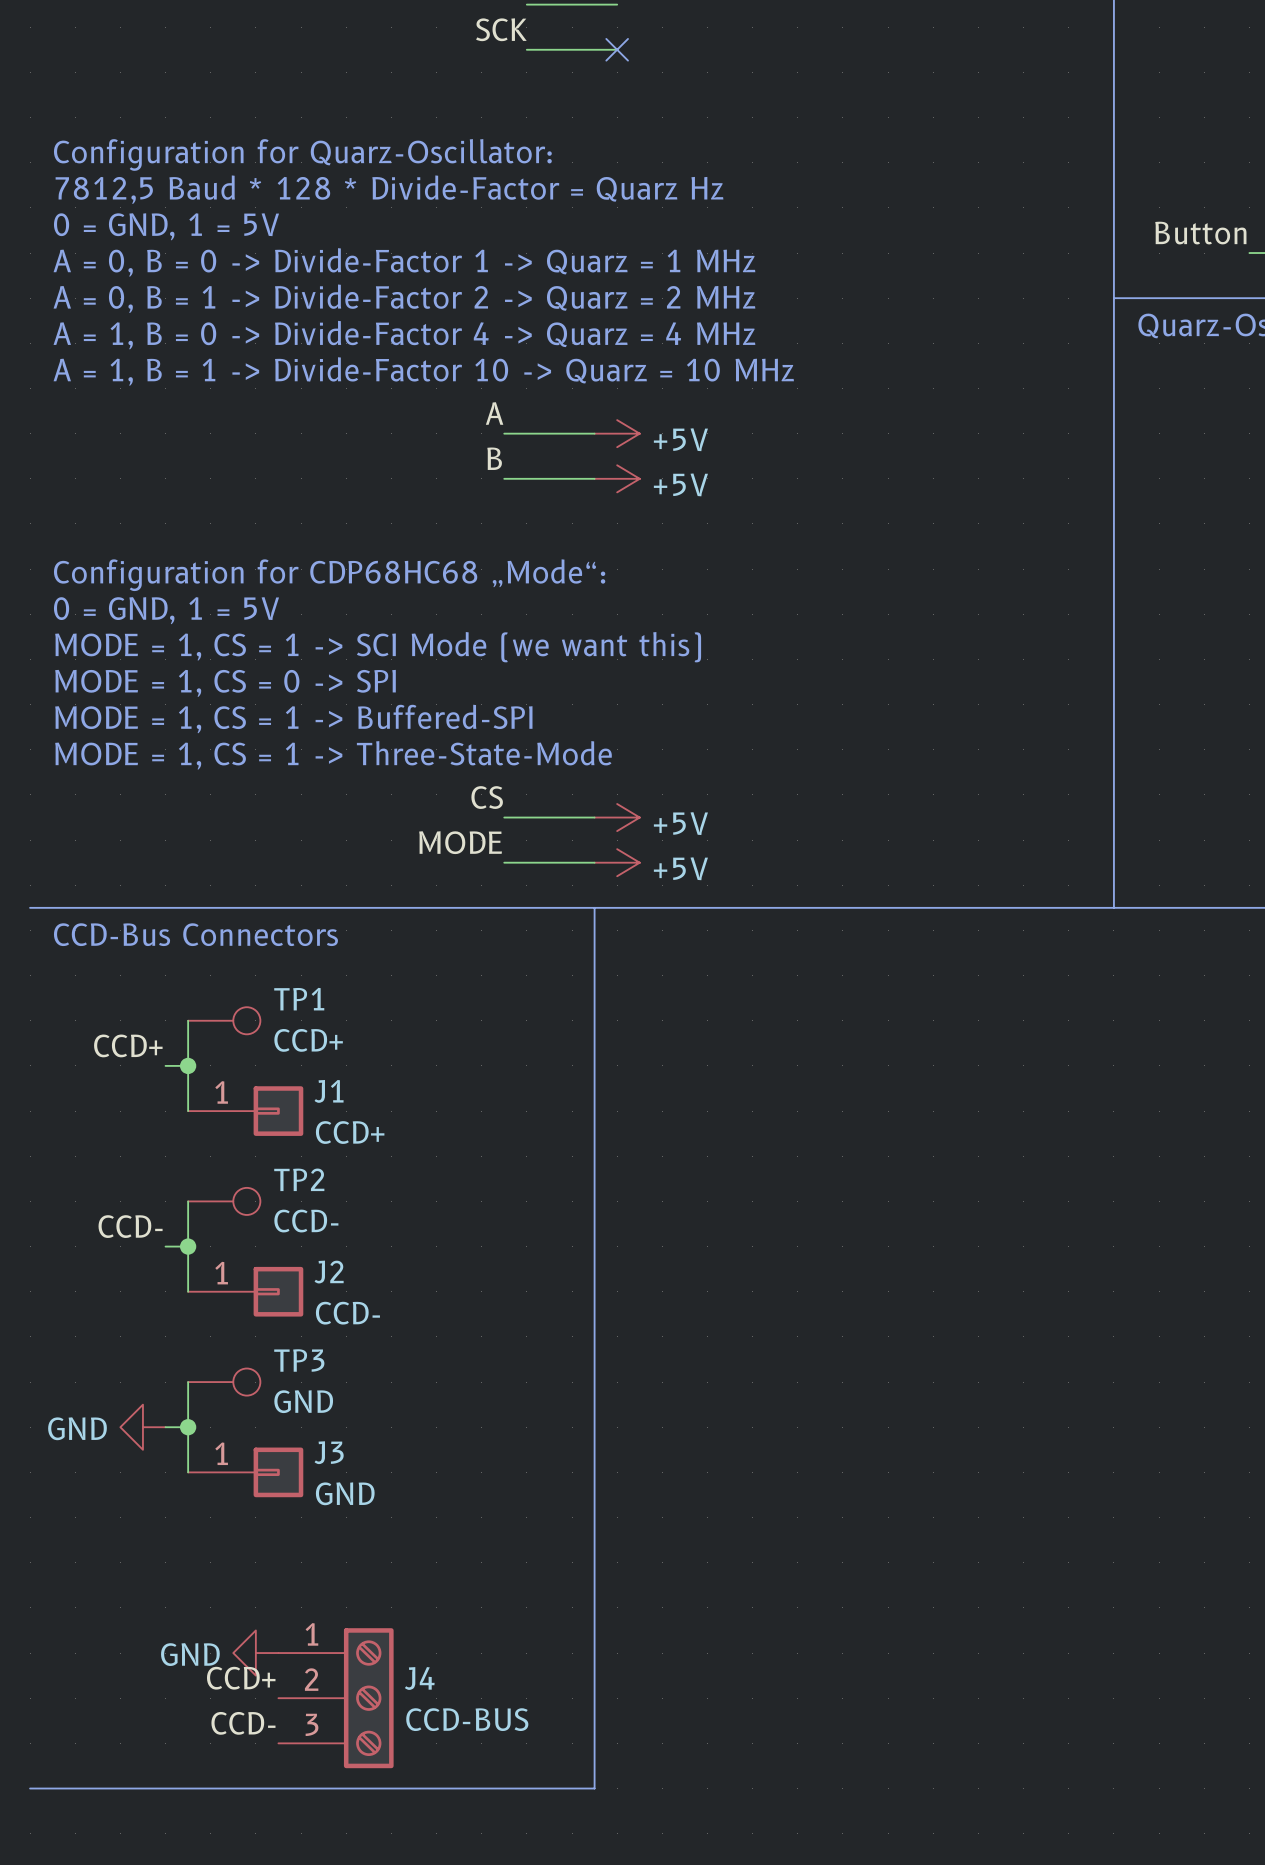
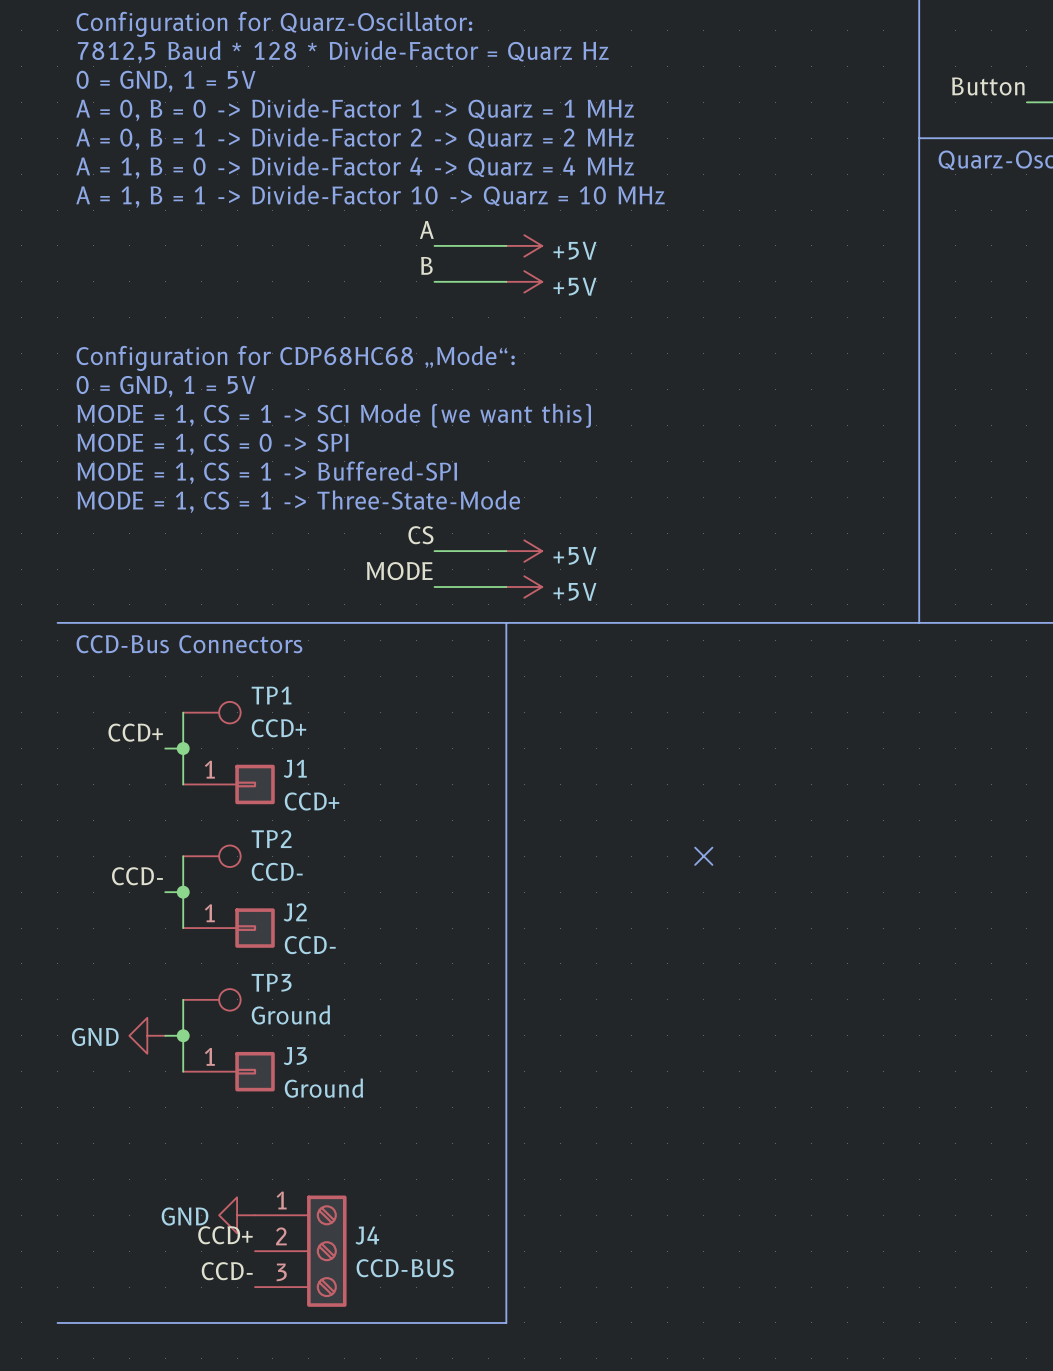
no-connect mark: none -> (703, 856)
TP3 value: GND (303, 1401) -> Ground (290, 1014)
J3 value: GND (345, 1493) -> Ground (323, 1088)

